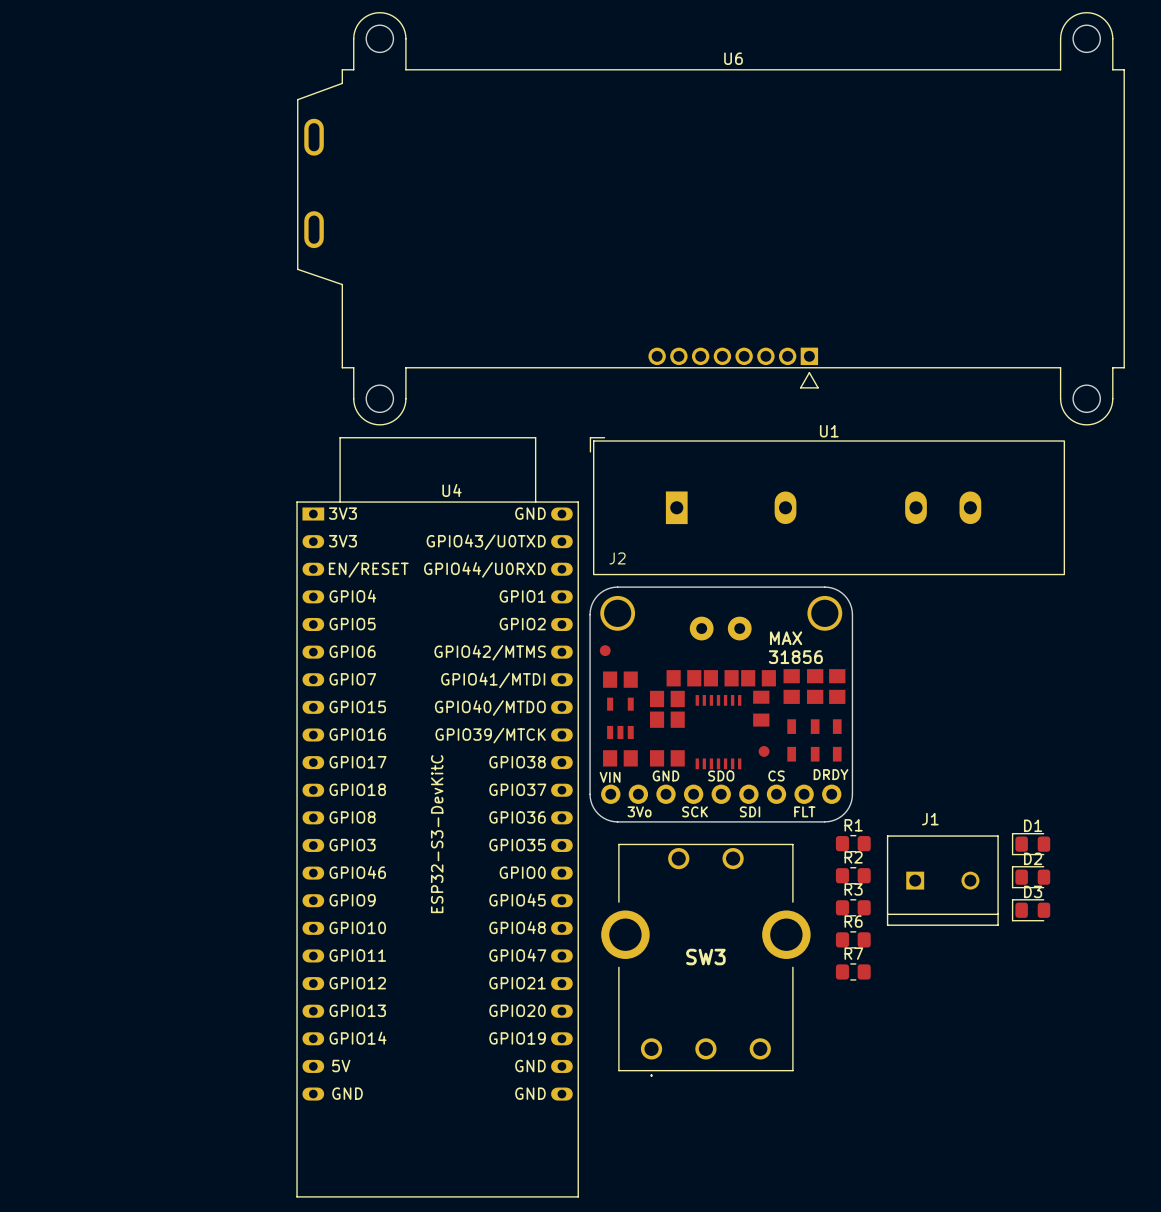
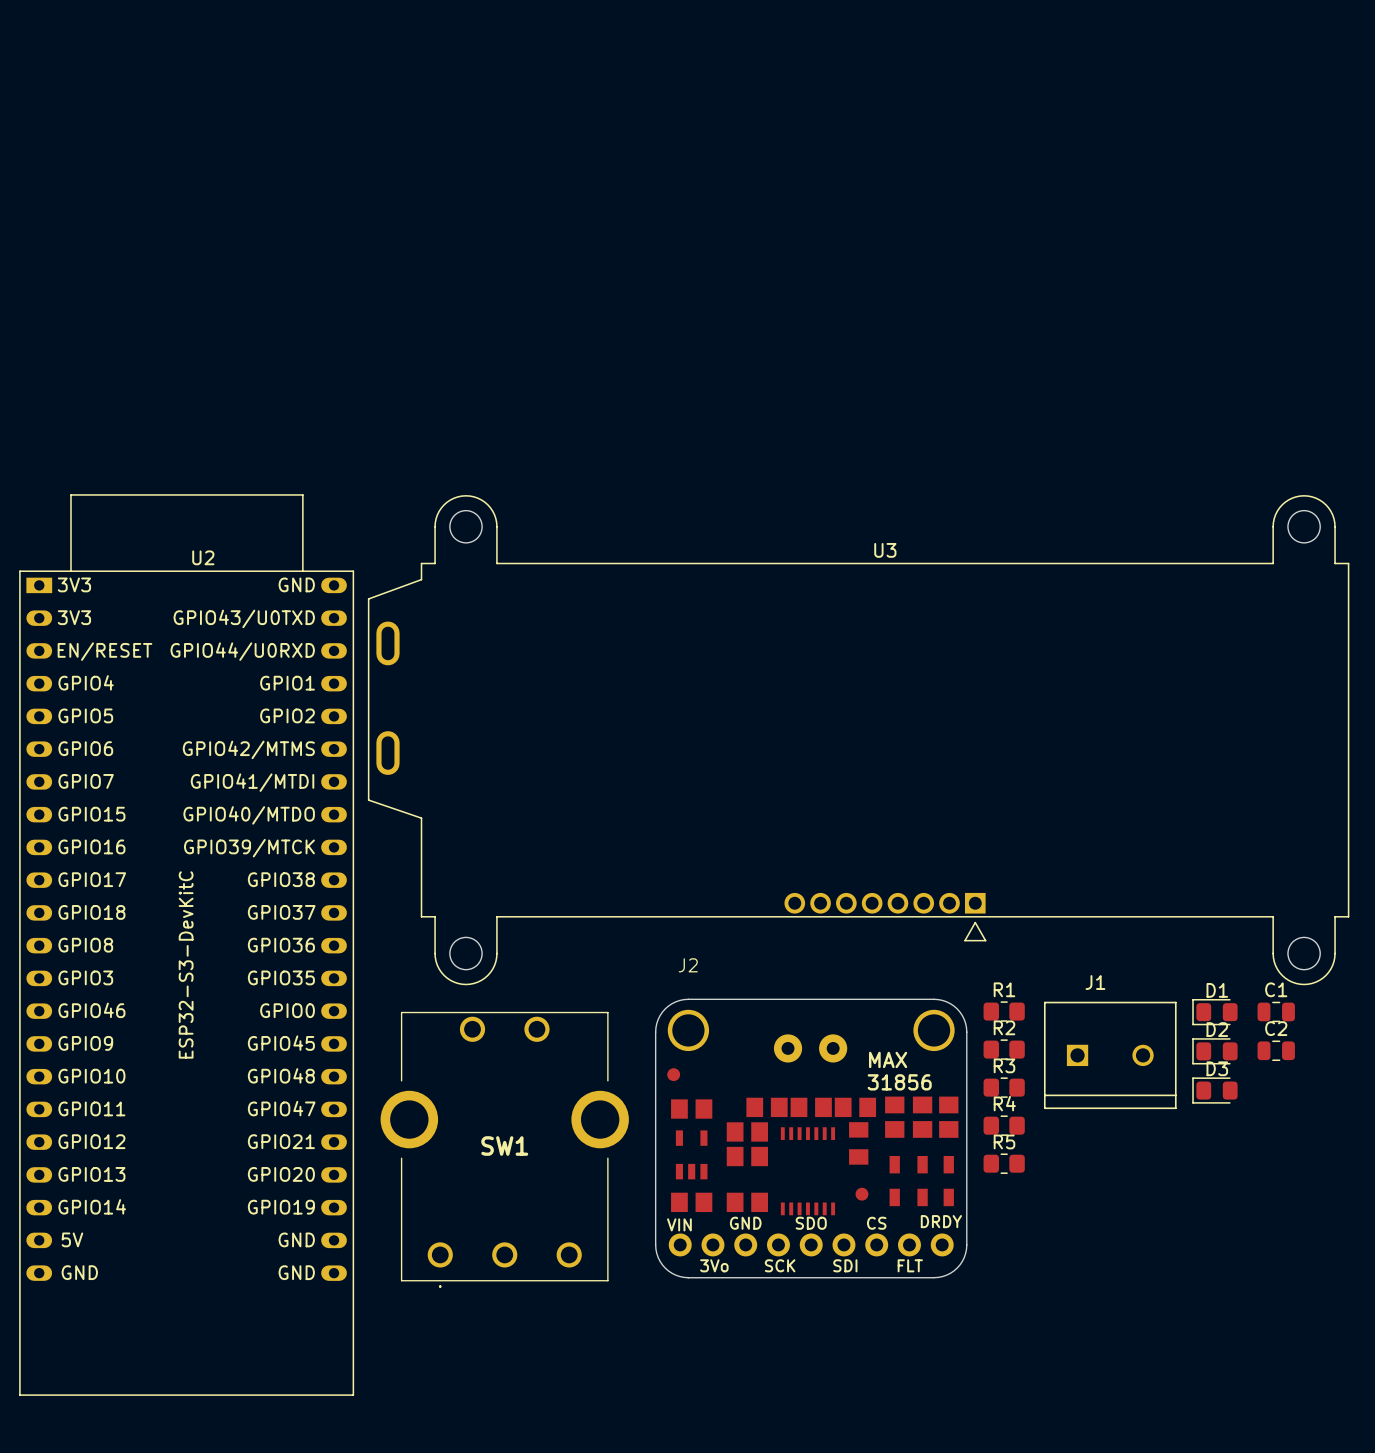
U6: (710, 218) -> none
U1: (827, 506) -> none
U3: none -> (858, 740)
J2 position: (721, 704) -> (811, 1138)
U2: none -> ESP32-S3-DevKitC (186, 945)
U4: ESP32-S3-DevKitC (437, 817) -> none
C1: none -> (1276, 1011)
C2: none -> (1276, 1050)
R6 name: R6 (853, 921) -> R4 (1004, 1103)
R7 name: R7 (853, 953) -> R5 (1004, 1141)
SW1: none -> (504, 1149)
SW3: (705, 960) -> none

